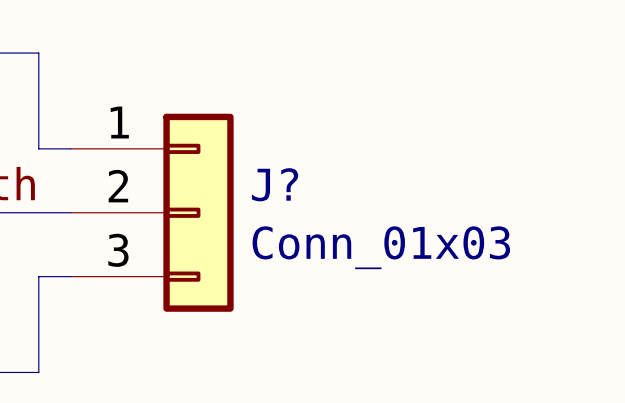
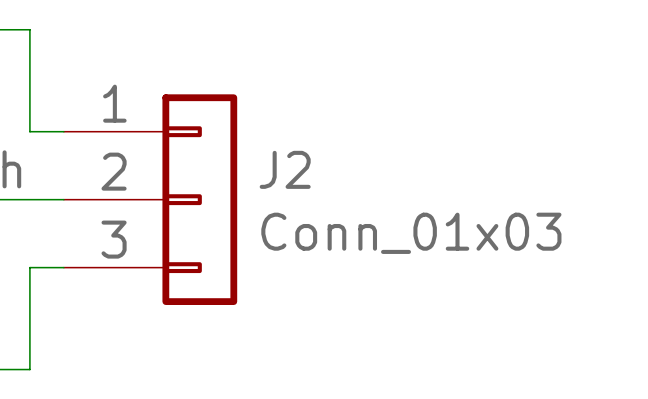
J? name: J? (275, 184) -> J2 (285, 169)

